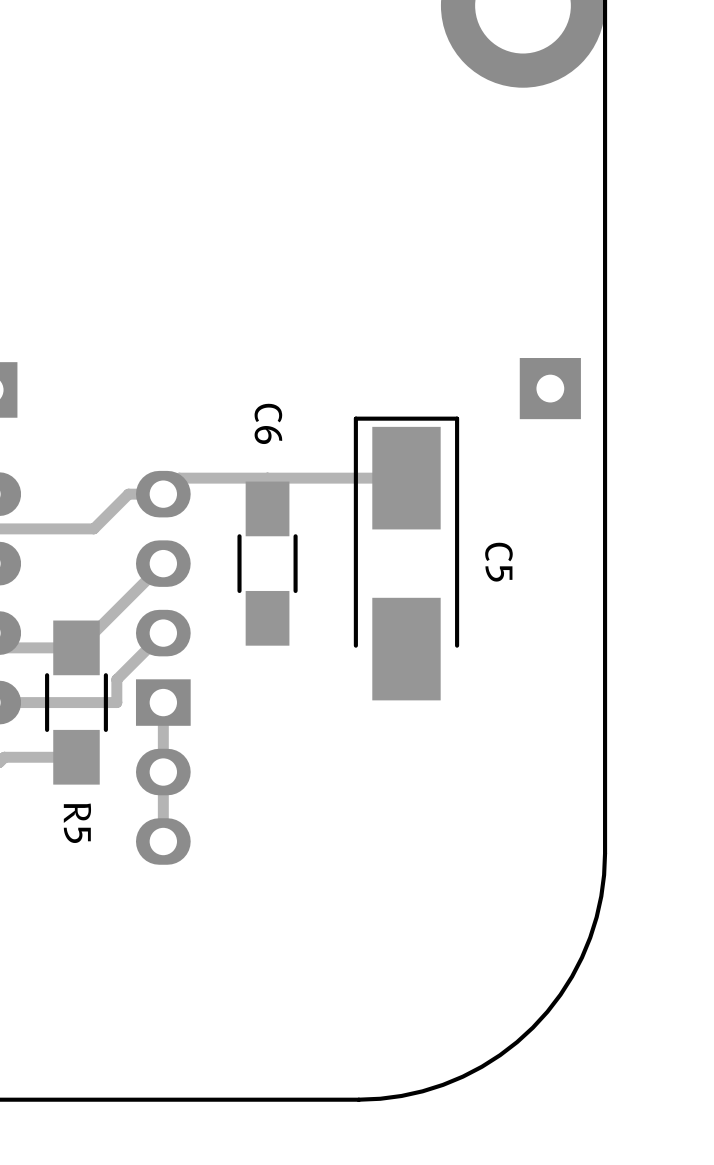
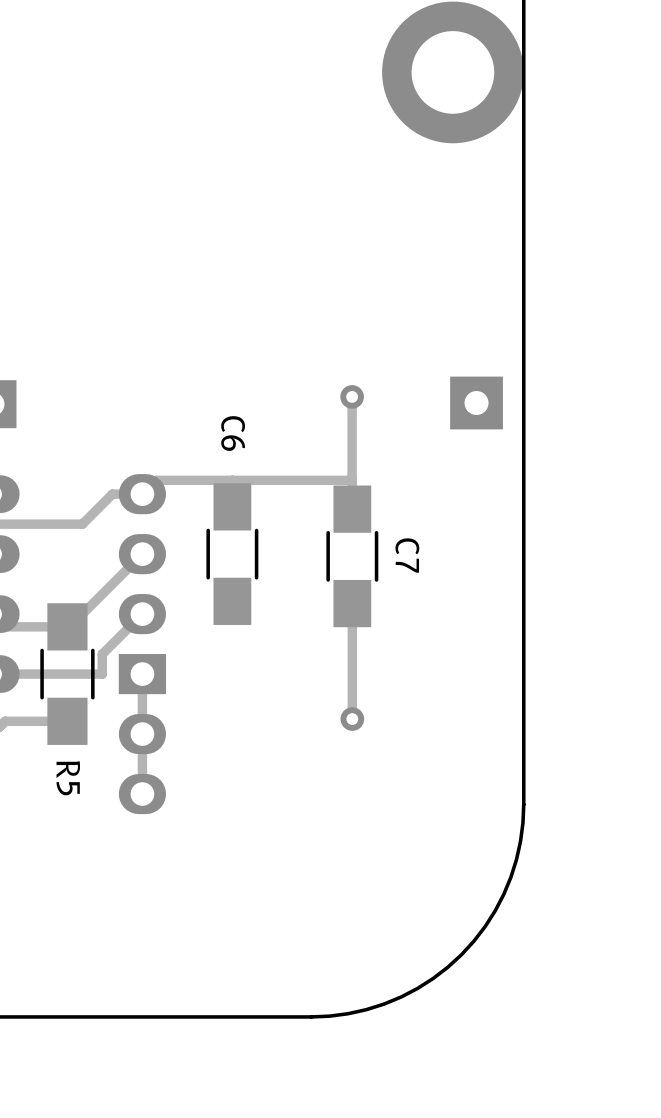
track: none -> (352, 396) (352, 480)
via: none -> (352, 396)
C5: (406, 558) -> none
C7: none -> (352, 556)
track: none -> (352, 603) (352, 719)
via: none -> (352, 719)

